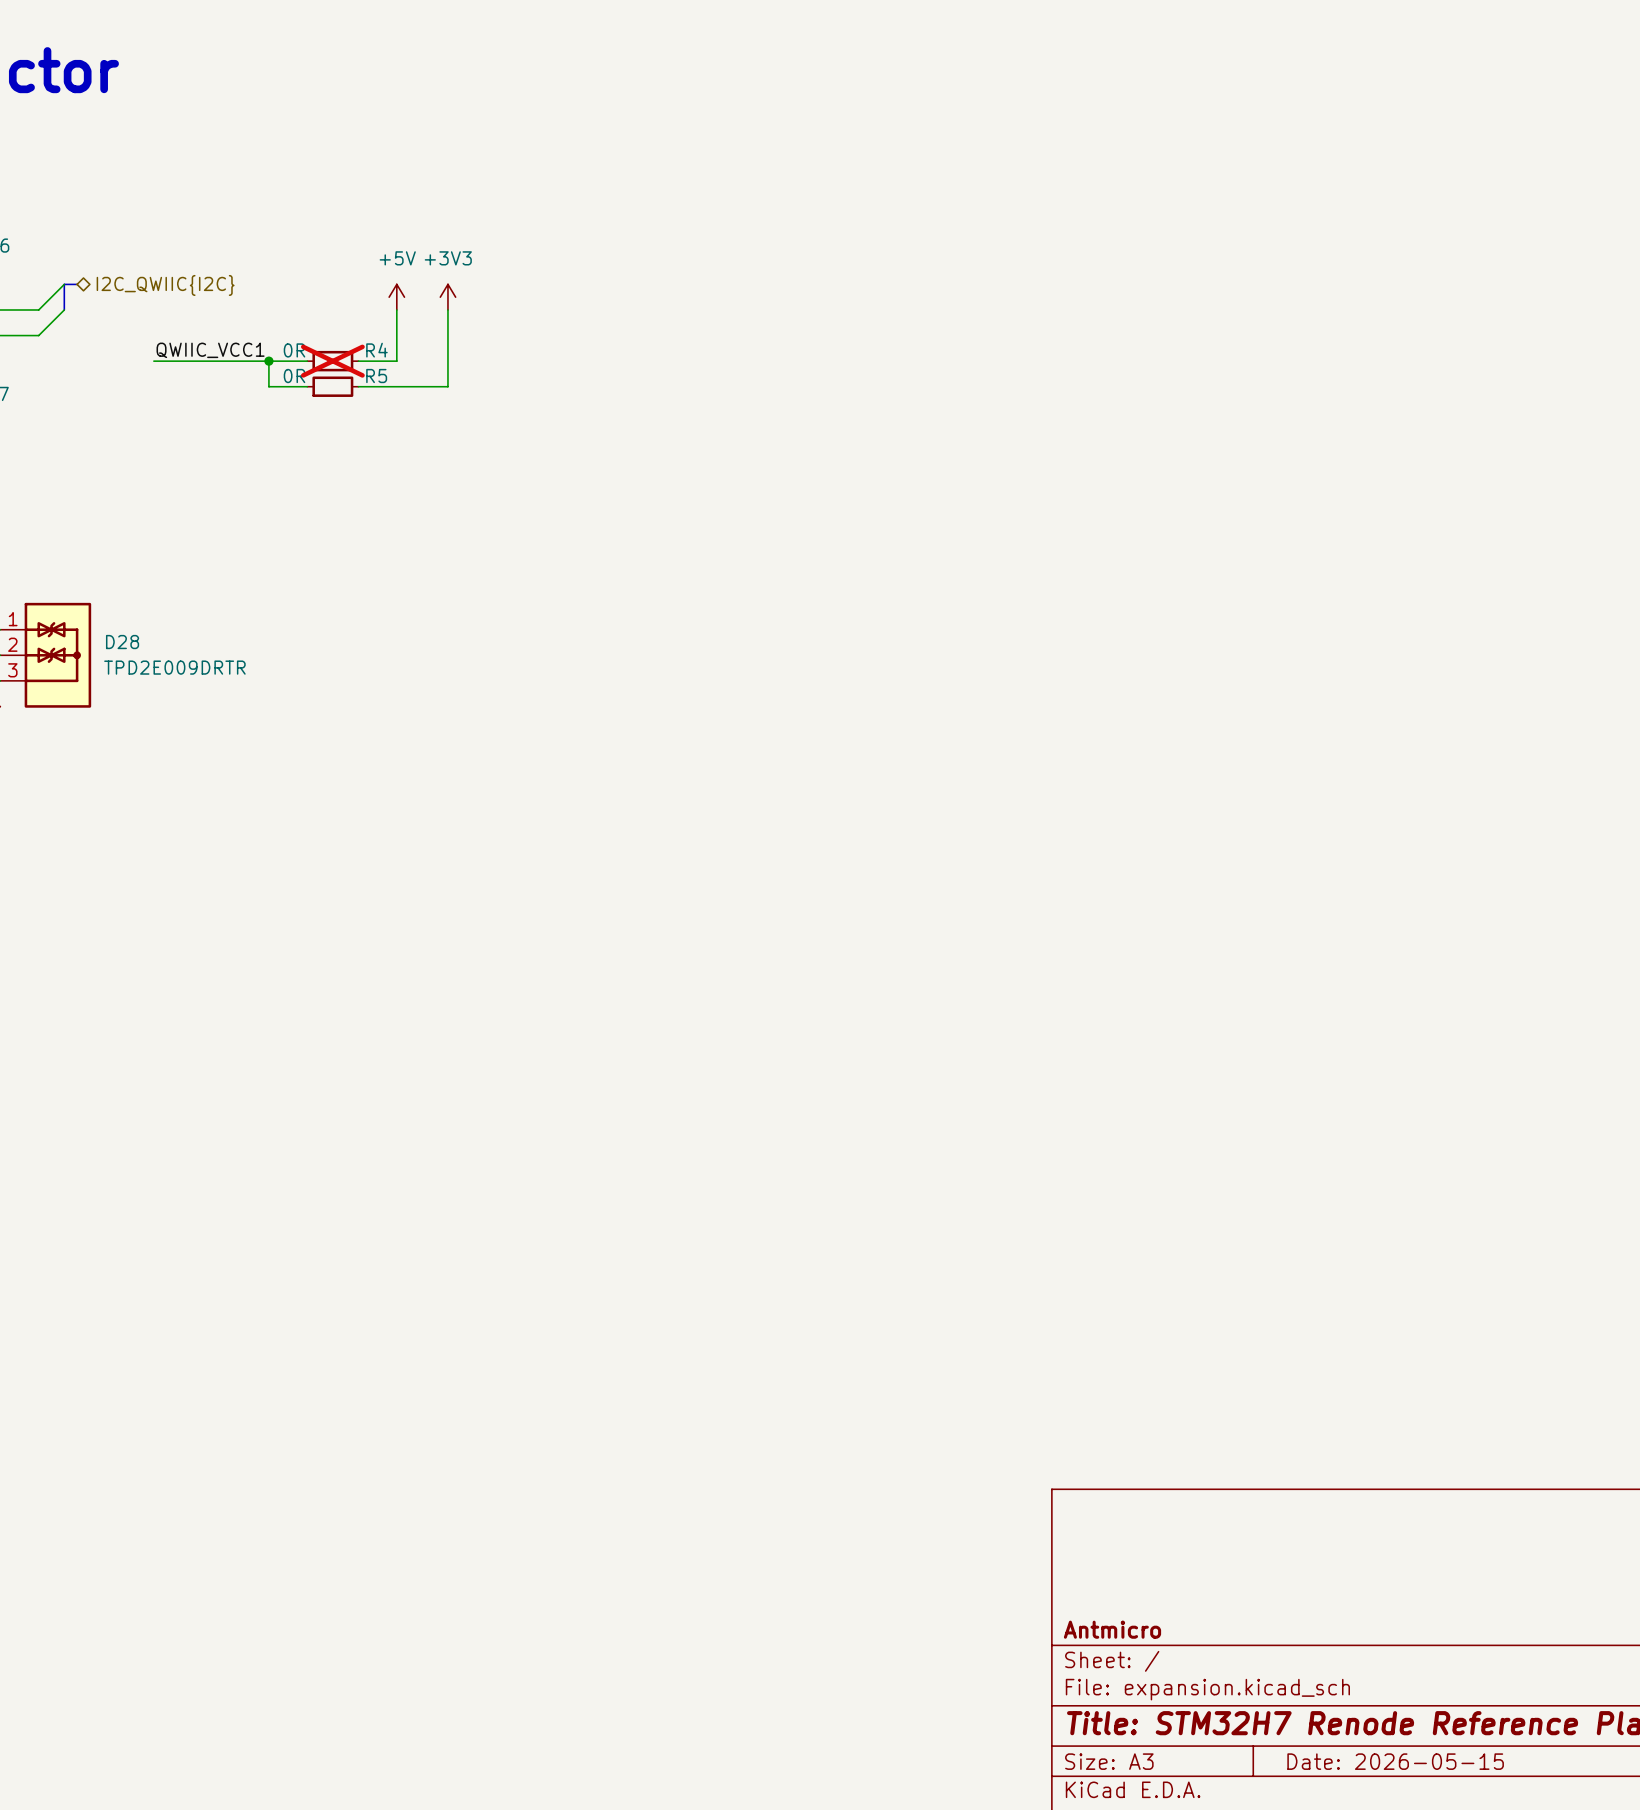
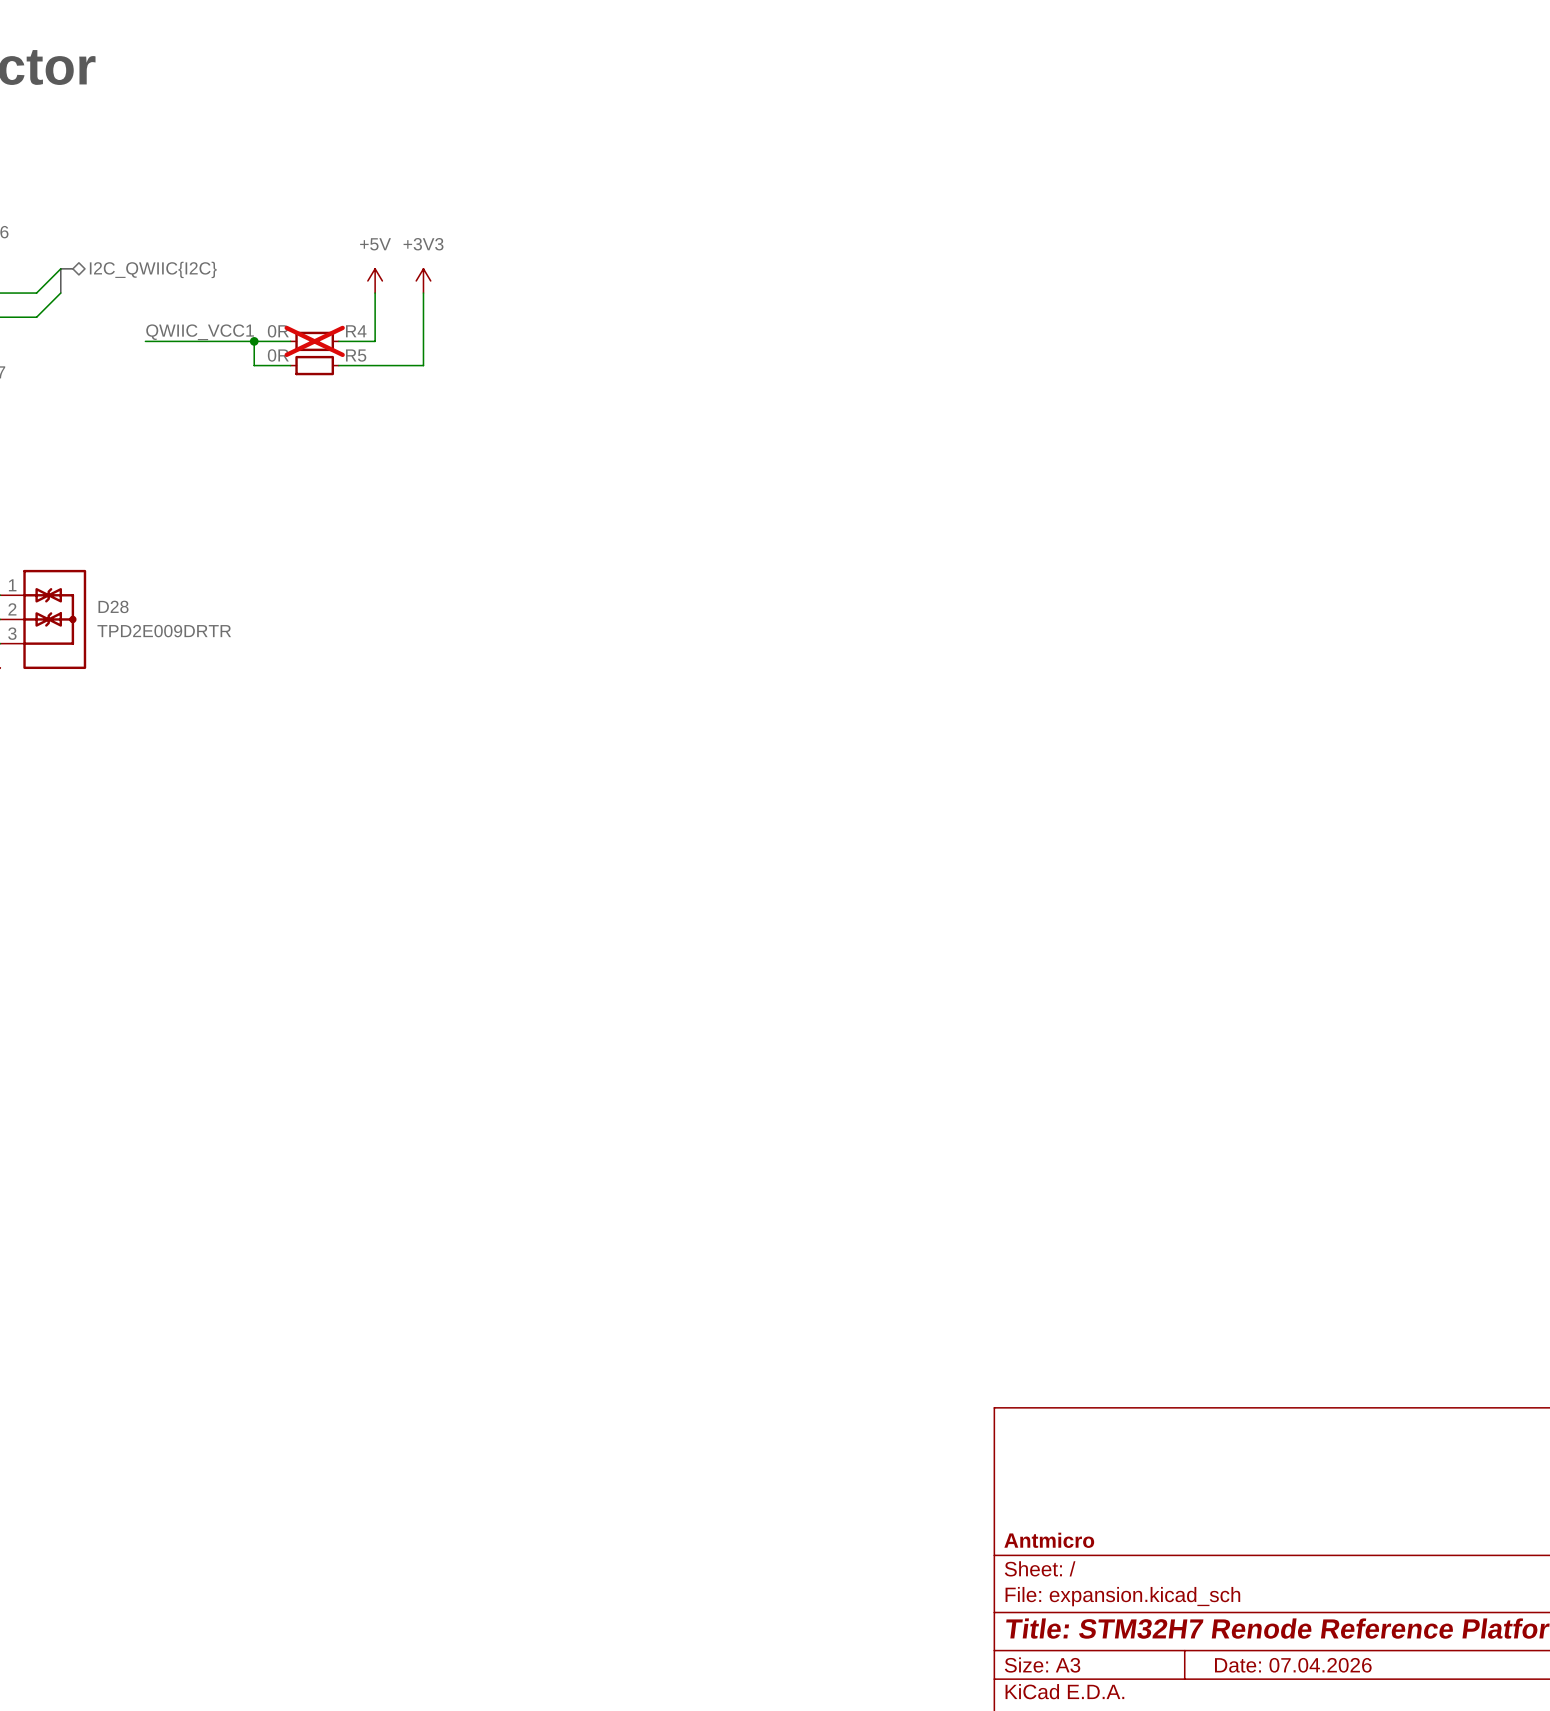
title block: Date: 2026-05-15 (1395, 1761) -> Date: 07.04.2026 (1293, 1665)

